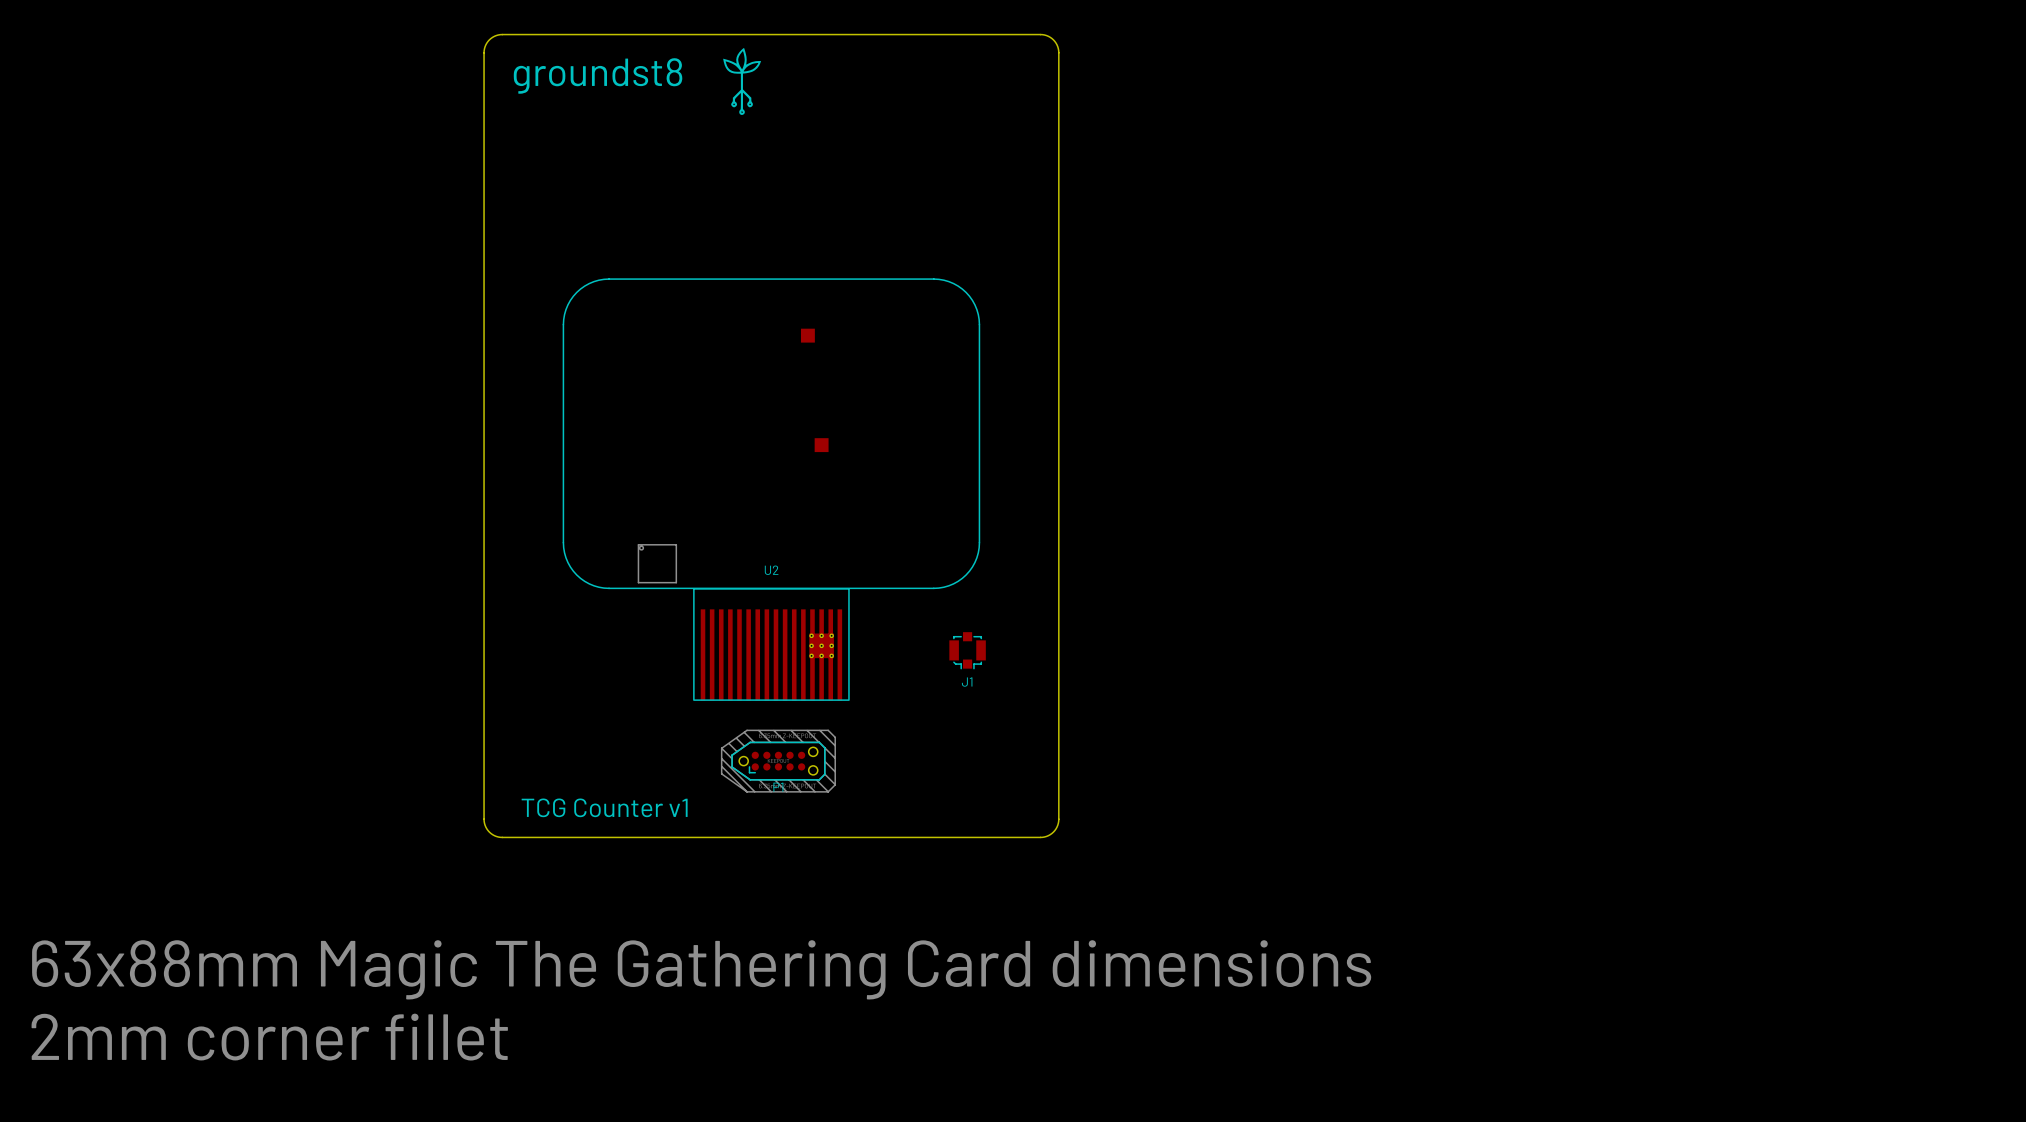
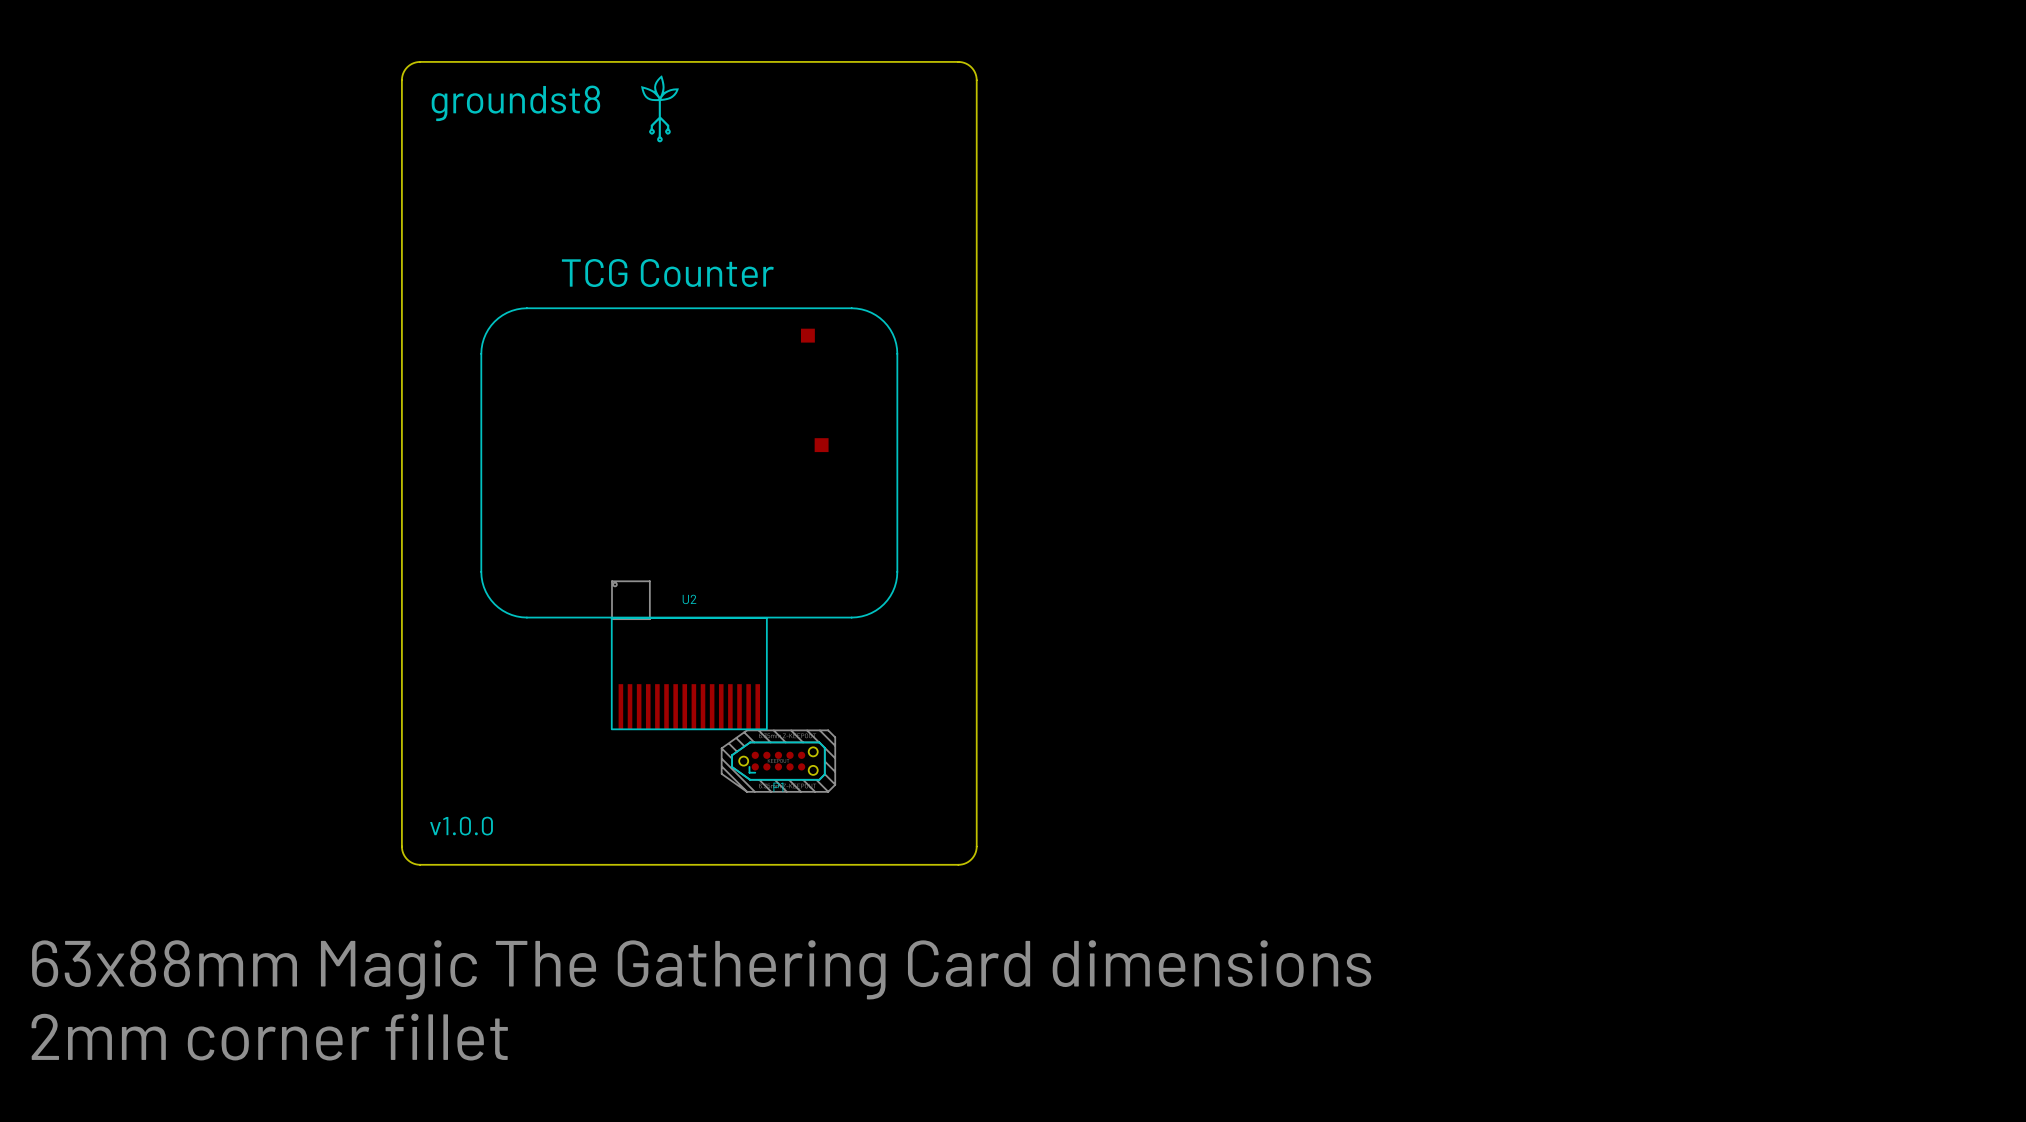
board edge: (502, 34) (1040, 34) (1050, 37) (1056, 43) (1058, 52) (1058, 819) (1056, 828) (1050, 834) (1040, 837) (502, 837) (492, 834) (486, 828) (484, 819) (484, 52) (489, 39) (502, 34) -> (420, 61) (958, 61) (966, 63) (973, 70) (976, 80) (976, 846) (973, 856) (968, 862) (958, 864) (420, 864) (412, 862) (404, 856) (401, 846) (401, 80) (407, 67) (420, 61)
text position: groundst8 (598, 75) -> groundst8 (515, 103)
drawing position: (742, 81) -> (659, 108)
text: none -> TCG Counter (667, 273)
U2 footprint: [562, 278, 980, 701] -> [480, 307, 898, 730]
part position: (657, 563) -> (630, 600)
part: (821, 645) -> none
J1: (967, 650) -> none
text: TCG Counter v1 (604, 807) -> none
text: none -> v1.0.0 (461, 826)

